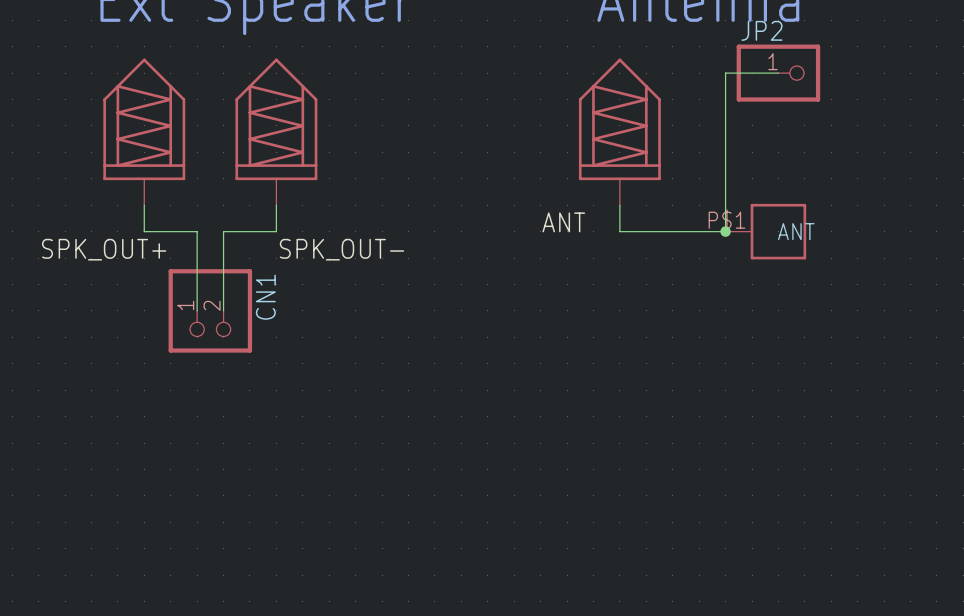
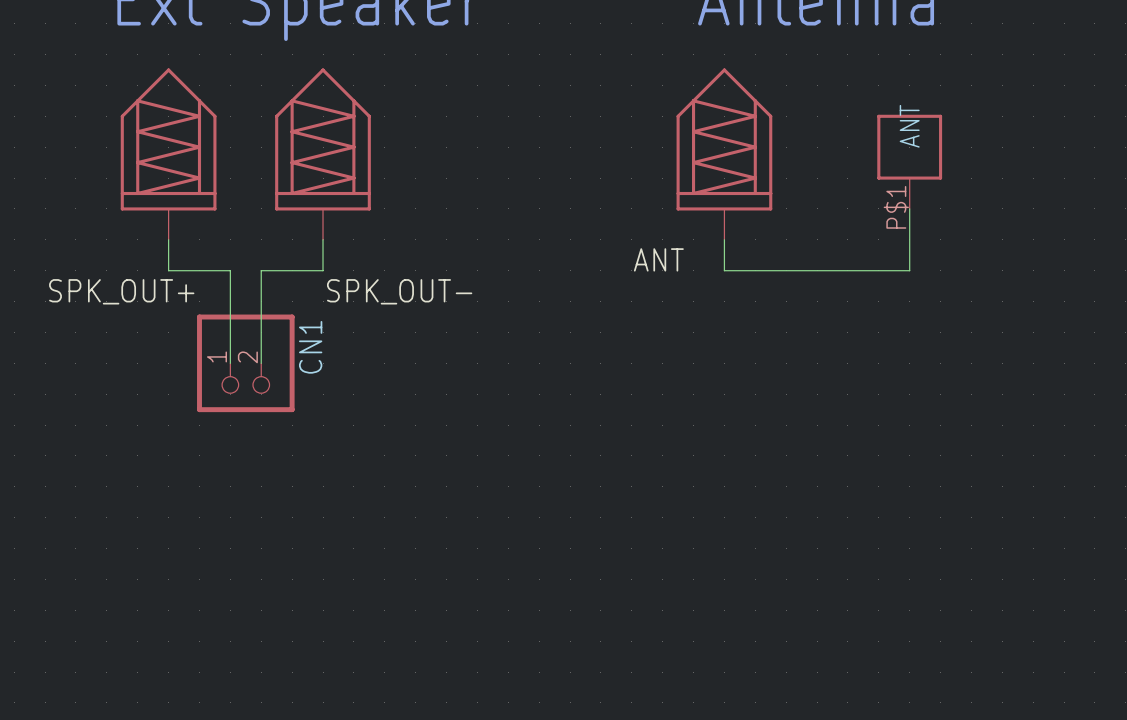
wire: (778, 73) (725, 73) (725, 231) -> (909, 208) (909, 270) (847, 270)
JP2: (778, 73) -> none
junction: (725, 231) -> none
part position: (765, 231) -> (909, 161)
part rotation: 0° (778, 231) -> 90° counterclockwise (909, 147)

